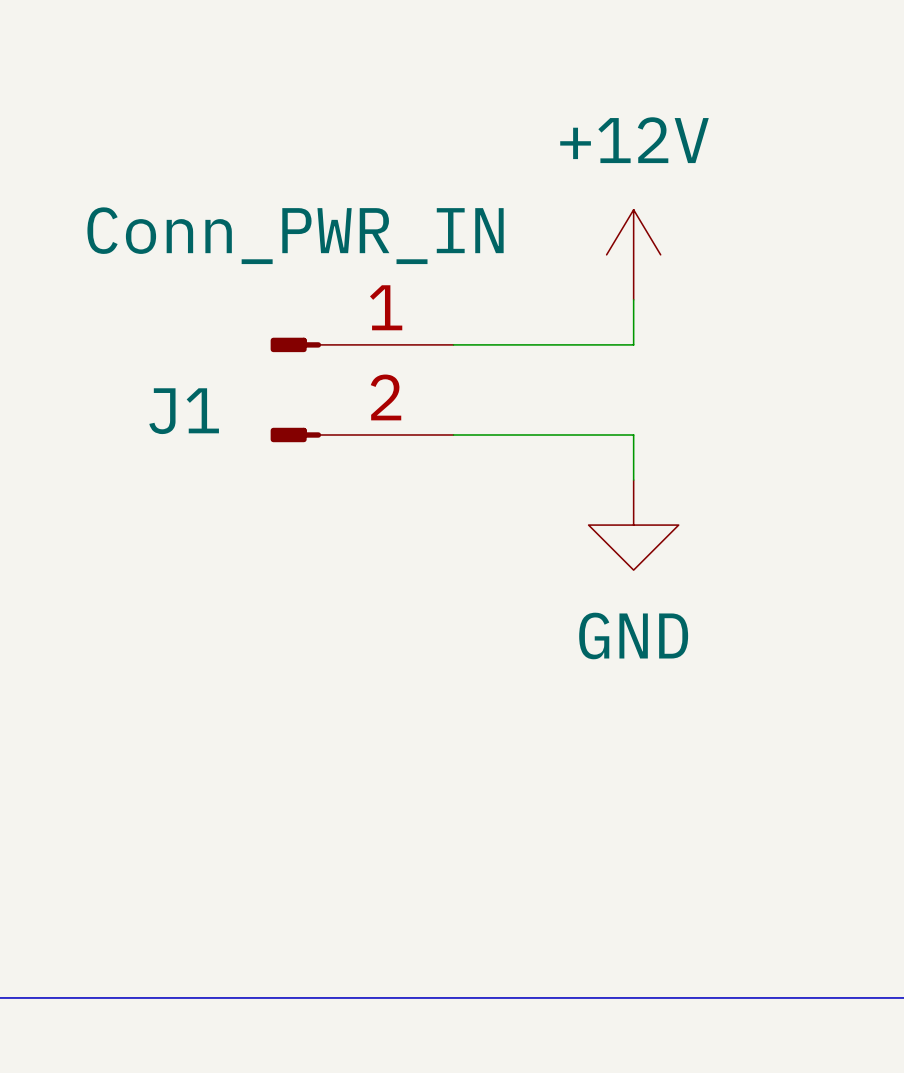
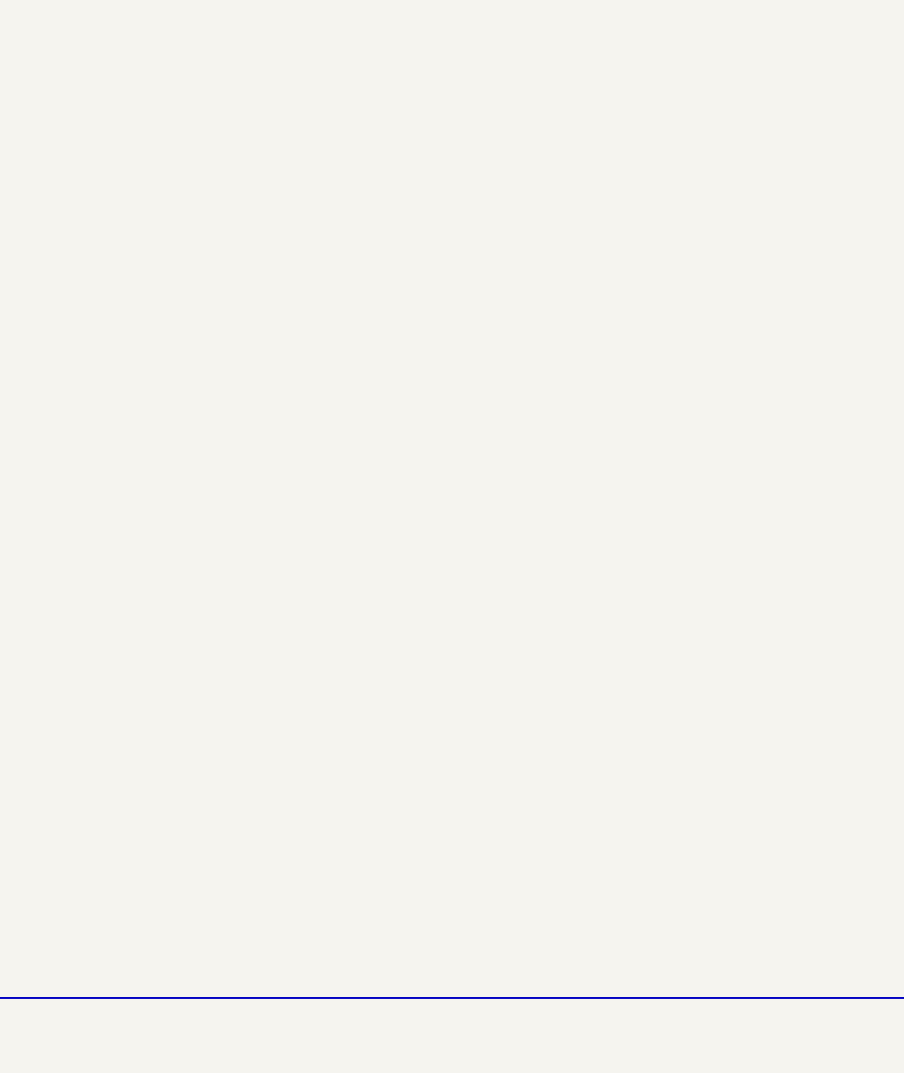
power symbol: +12V (633, 254) -> none
wire: (633, 299) (633, 344) (453, 344) -> none
J1: Conn_PWR_IN (362, 389) -> none
wire: (453, 434) (633, 434) (633, 480) -> none
power symbol: GND (633, 525) -> none

